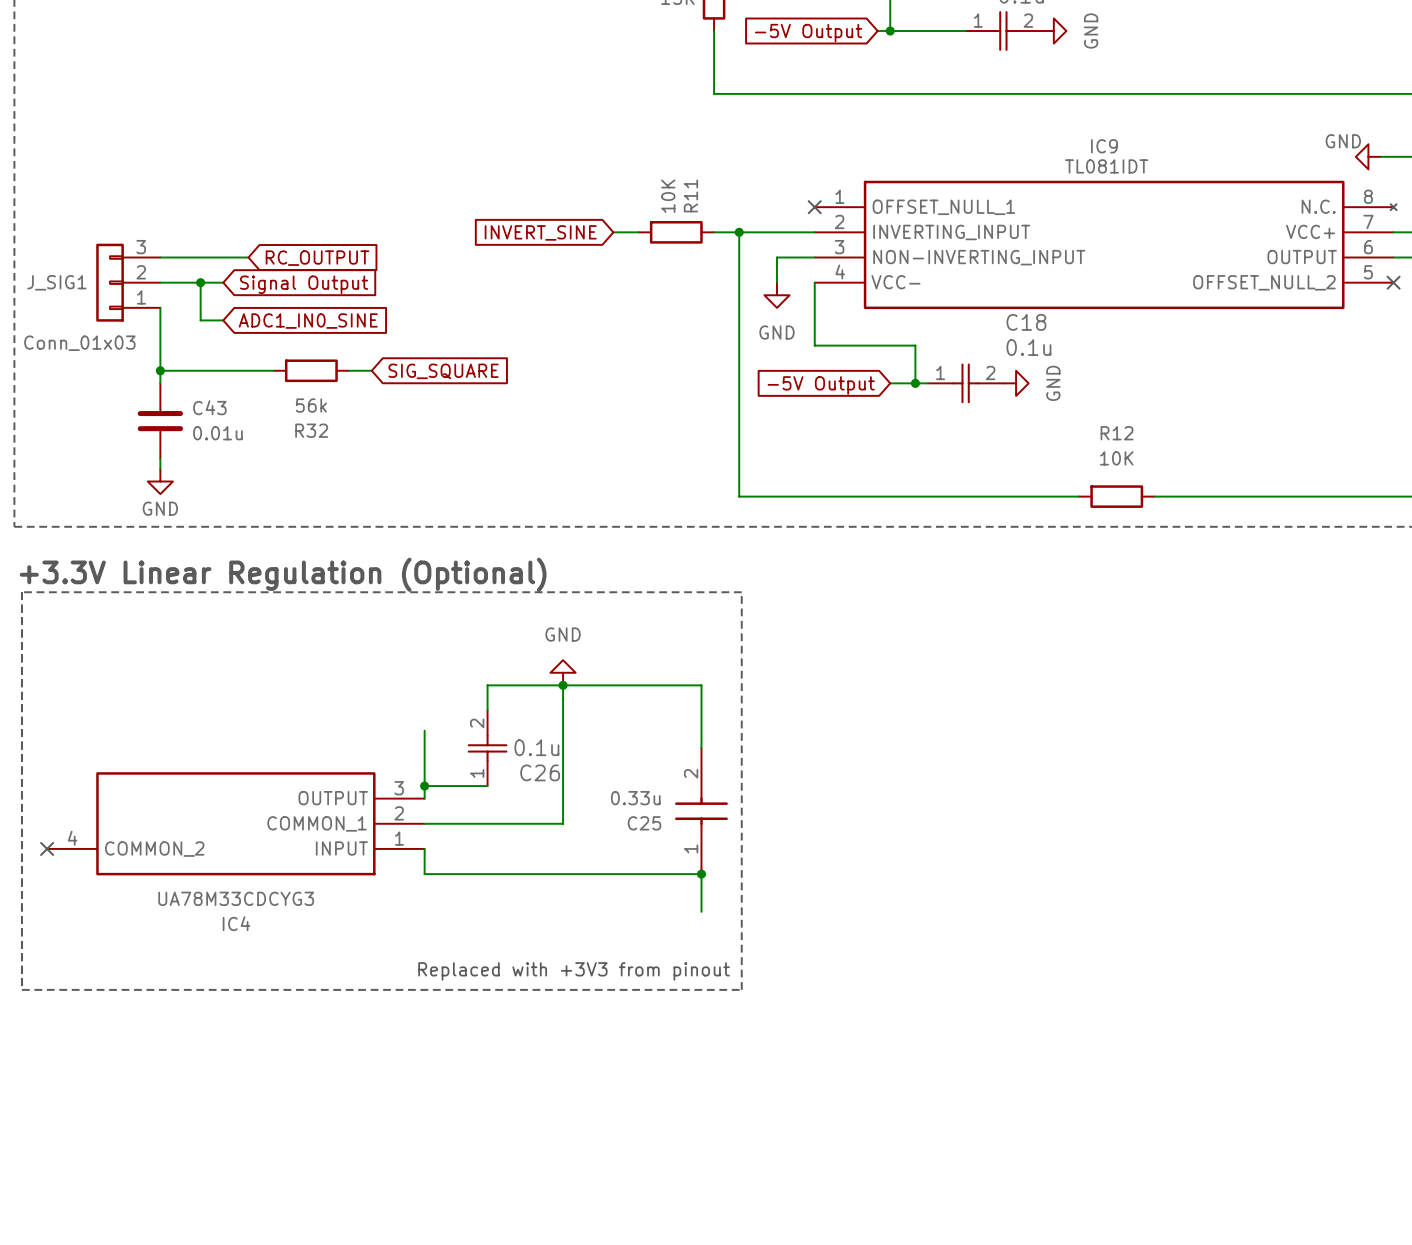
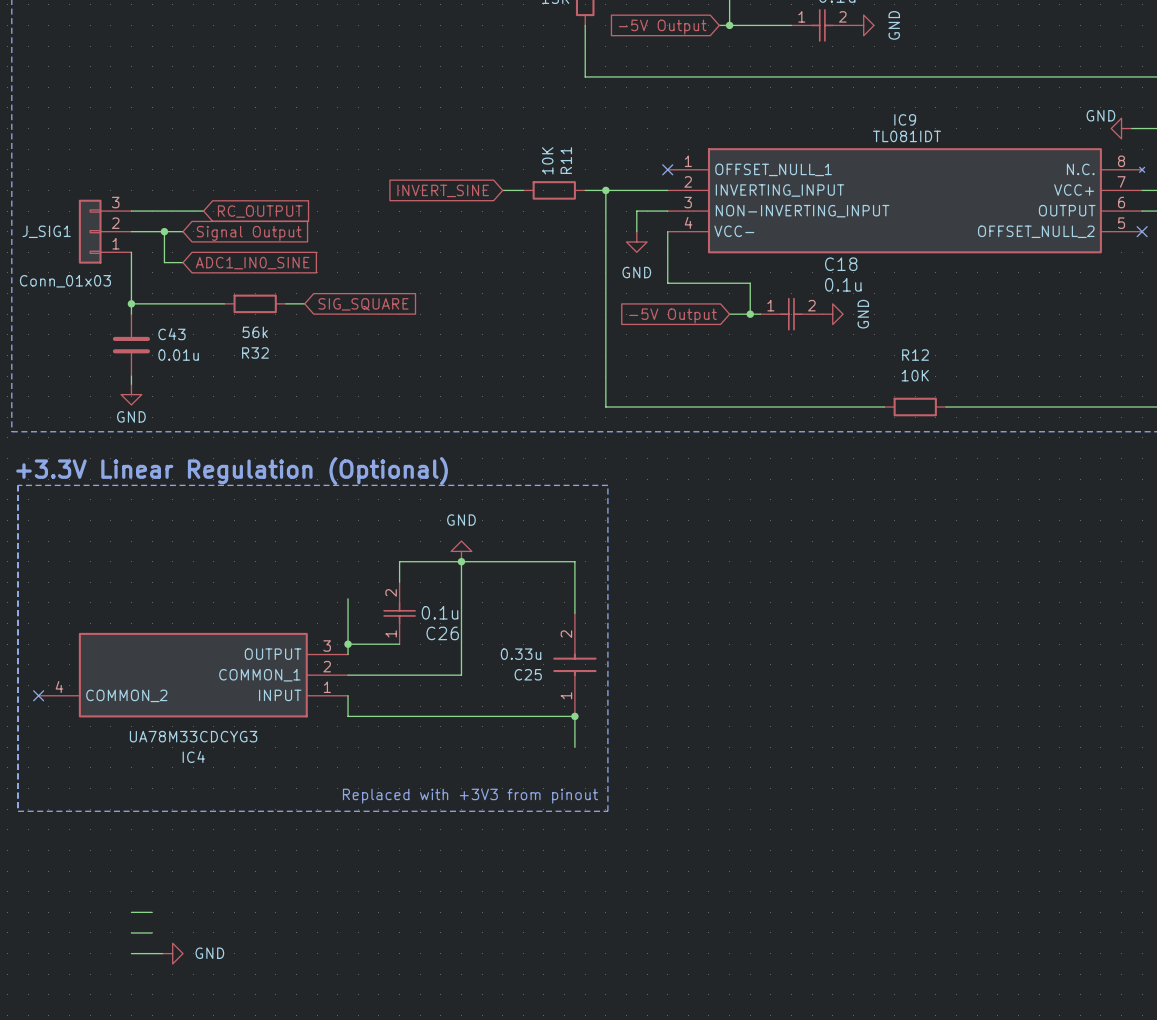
wire: none -> (131, 912) (152, 912)
wire: none -> (131, 932) (152, 932)
wire: none -> (131, 953) (162, 953)
power symbol: none -> GND (172, 953)

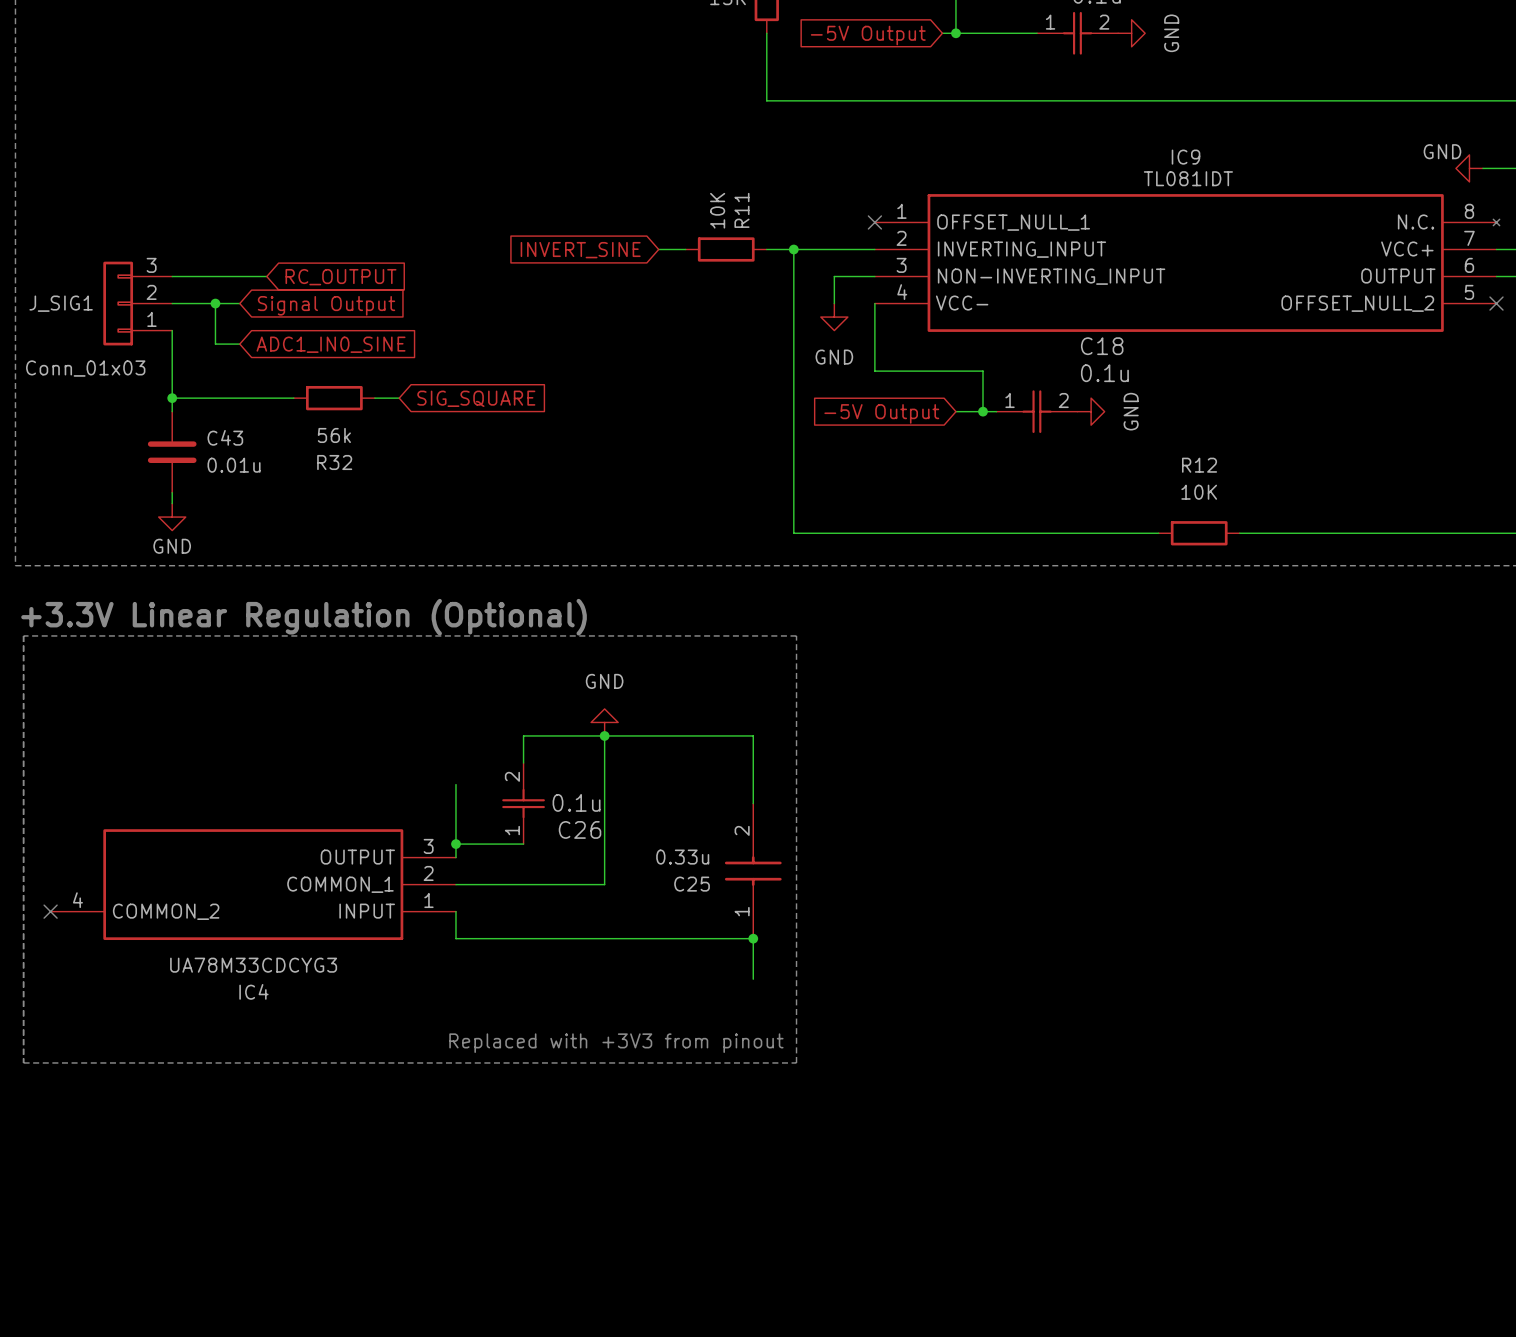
wire: (131, 912) (152, 912) -> none
wire: (131, 932) (152, 932) -> none
wire: (131, 953) (162, 953) -> none
power symbol: GND (172, 953) -> none

